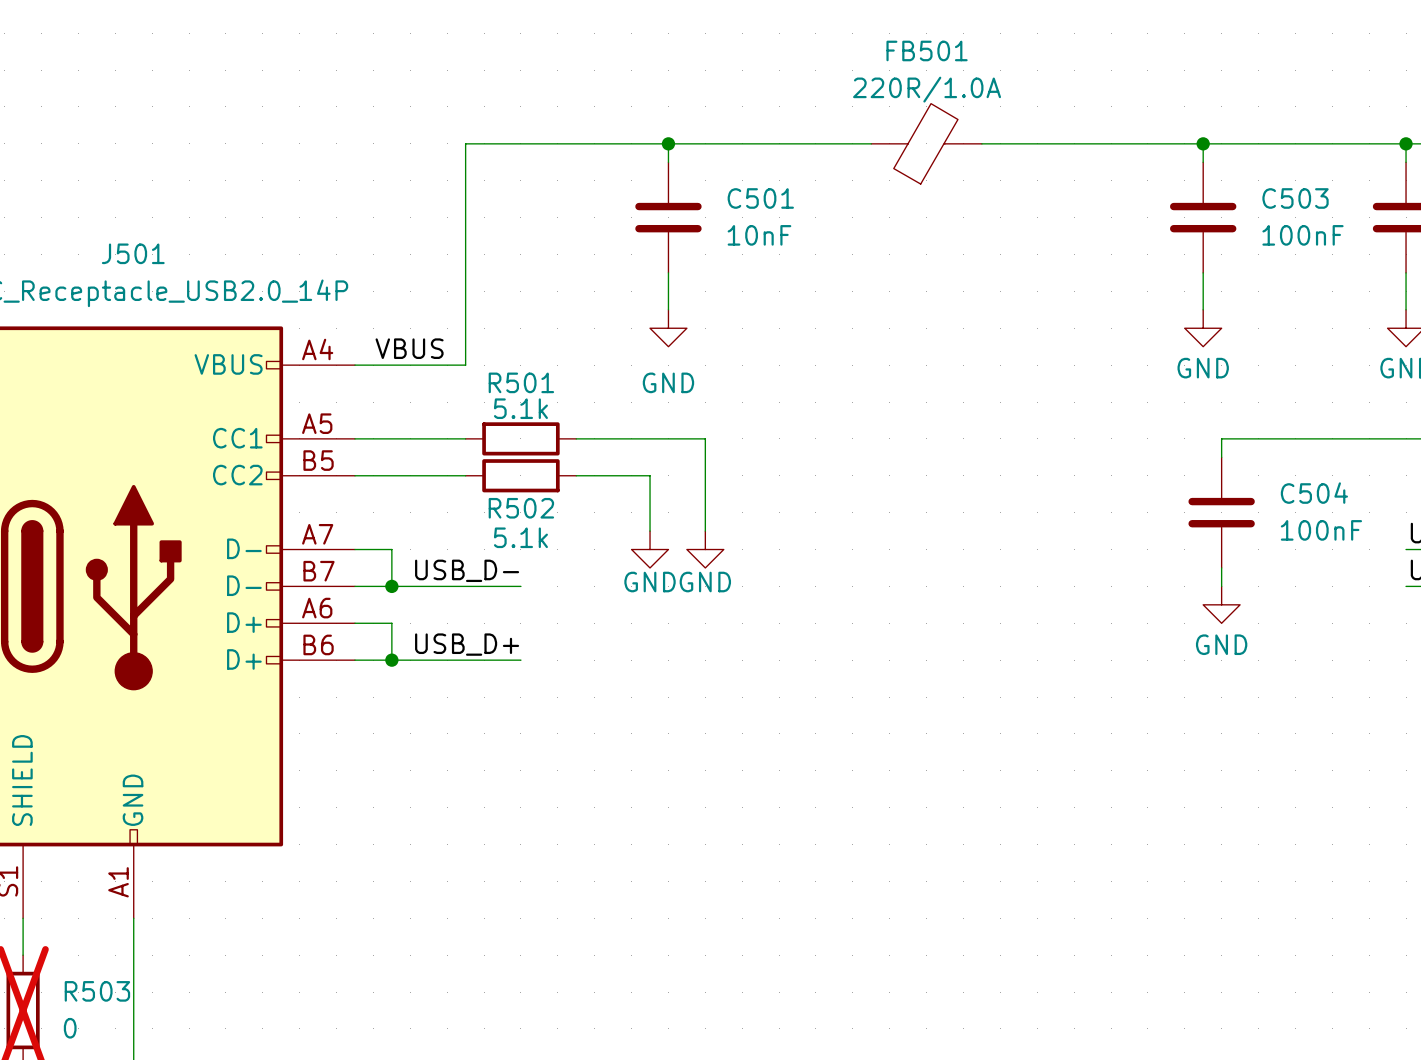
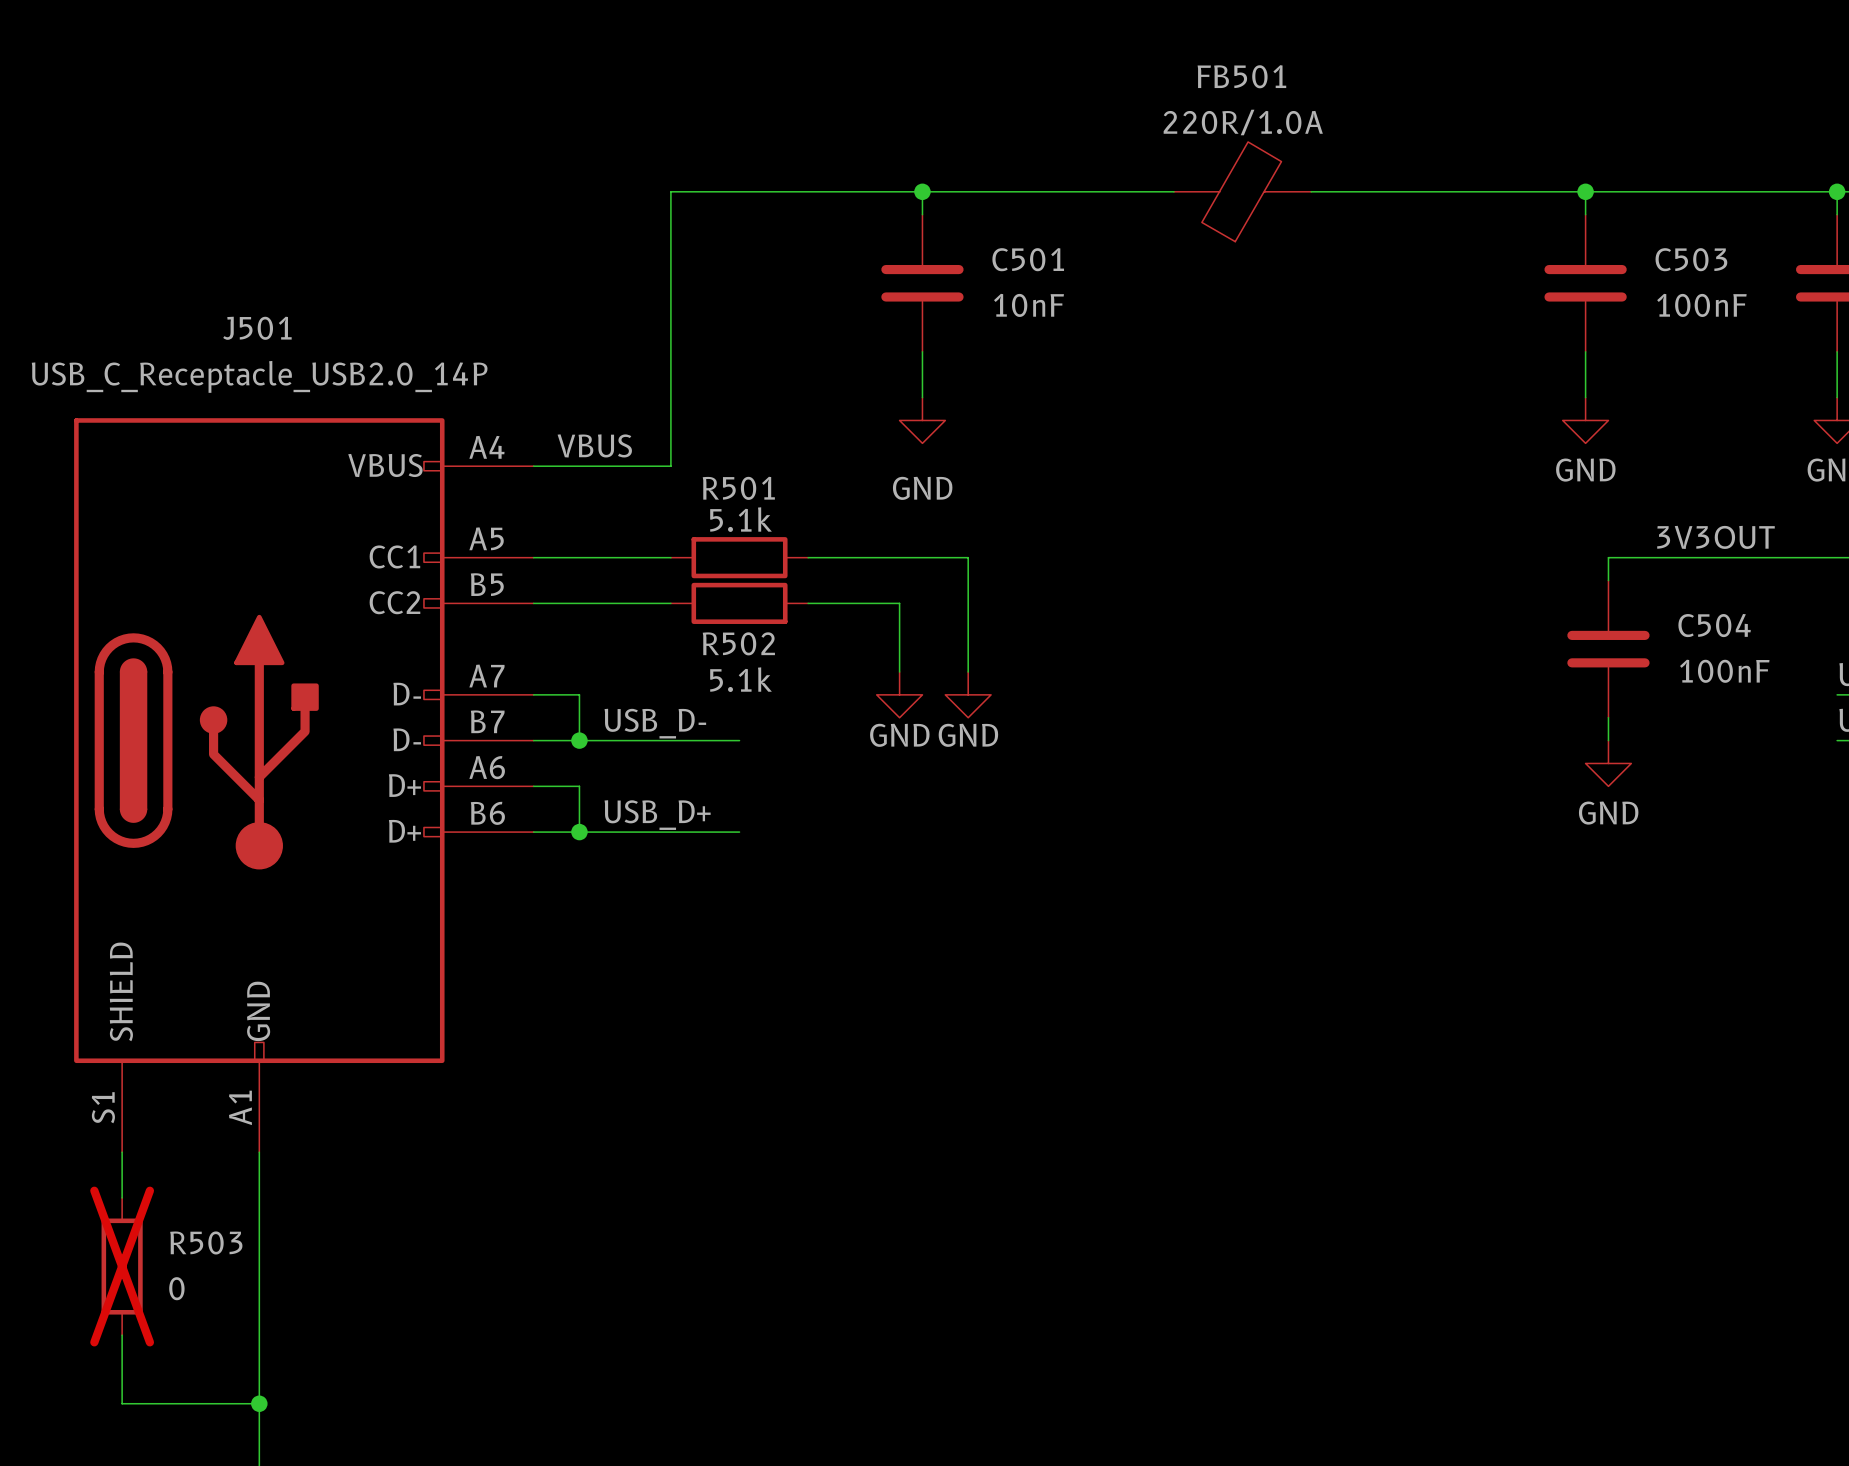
label: none -> 3V3OUT (1715, 537)

